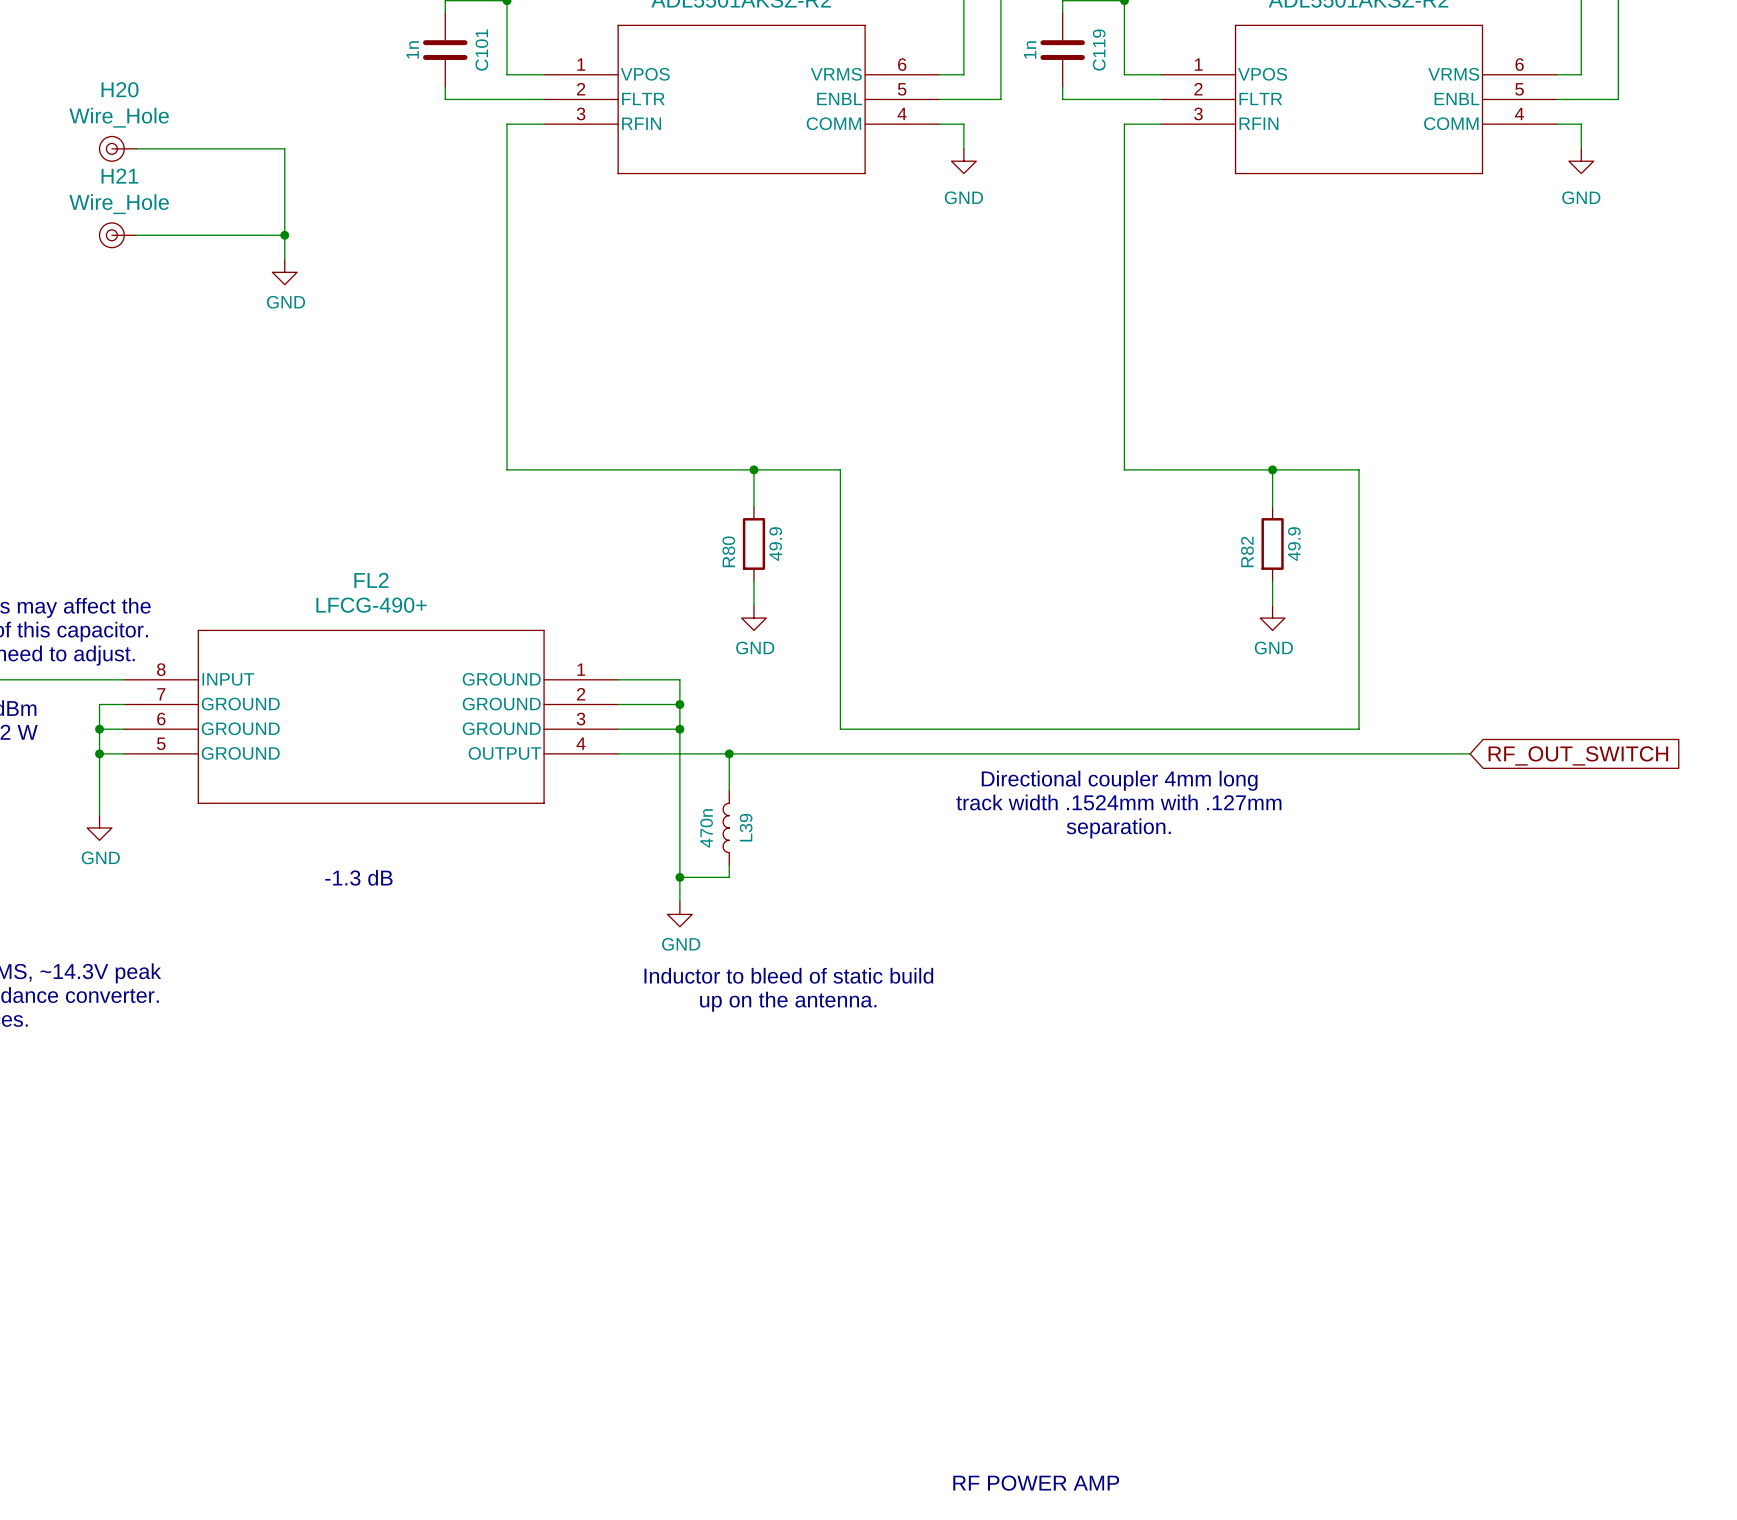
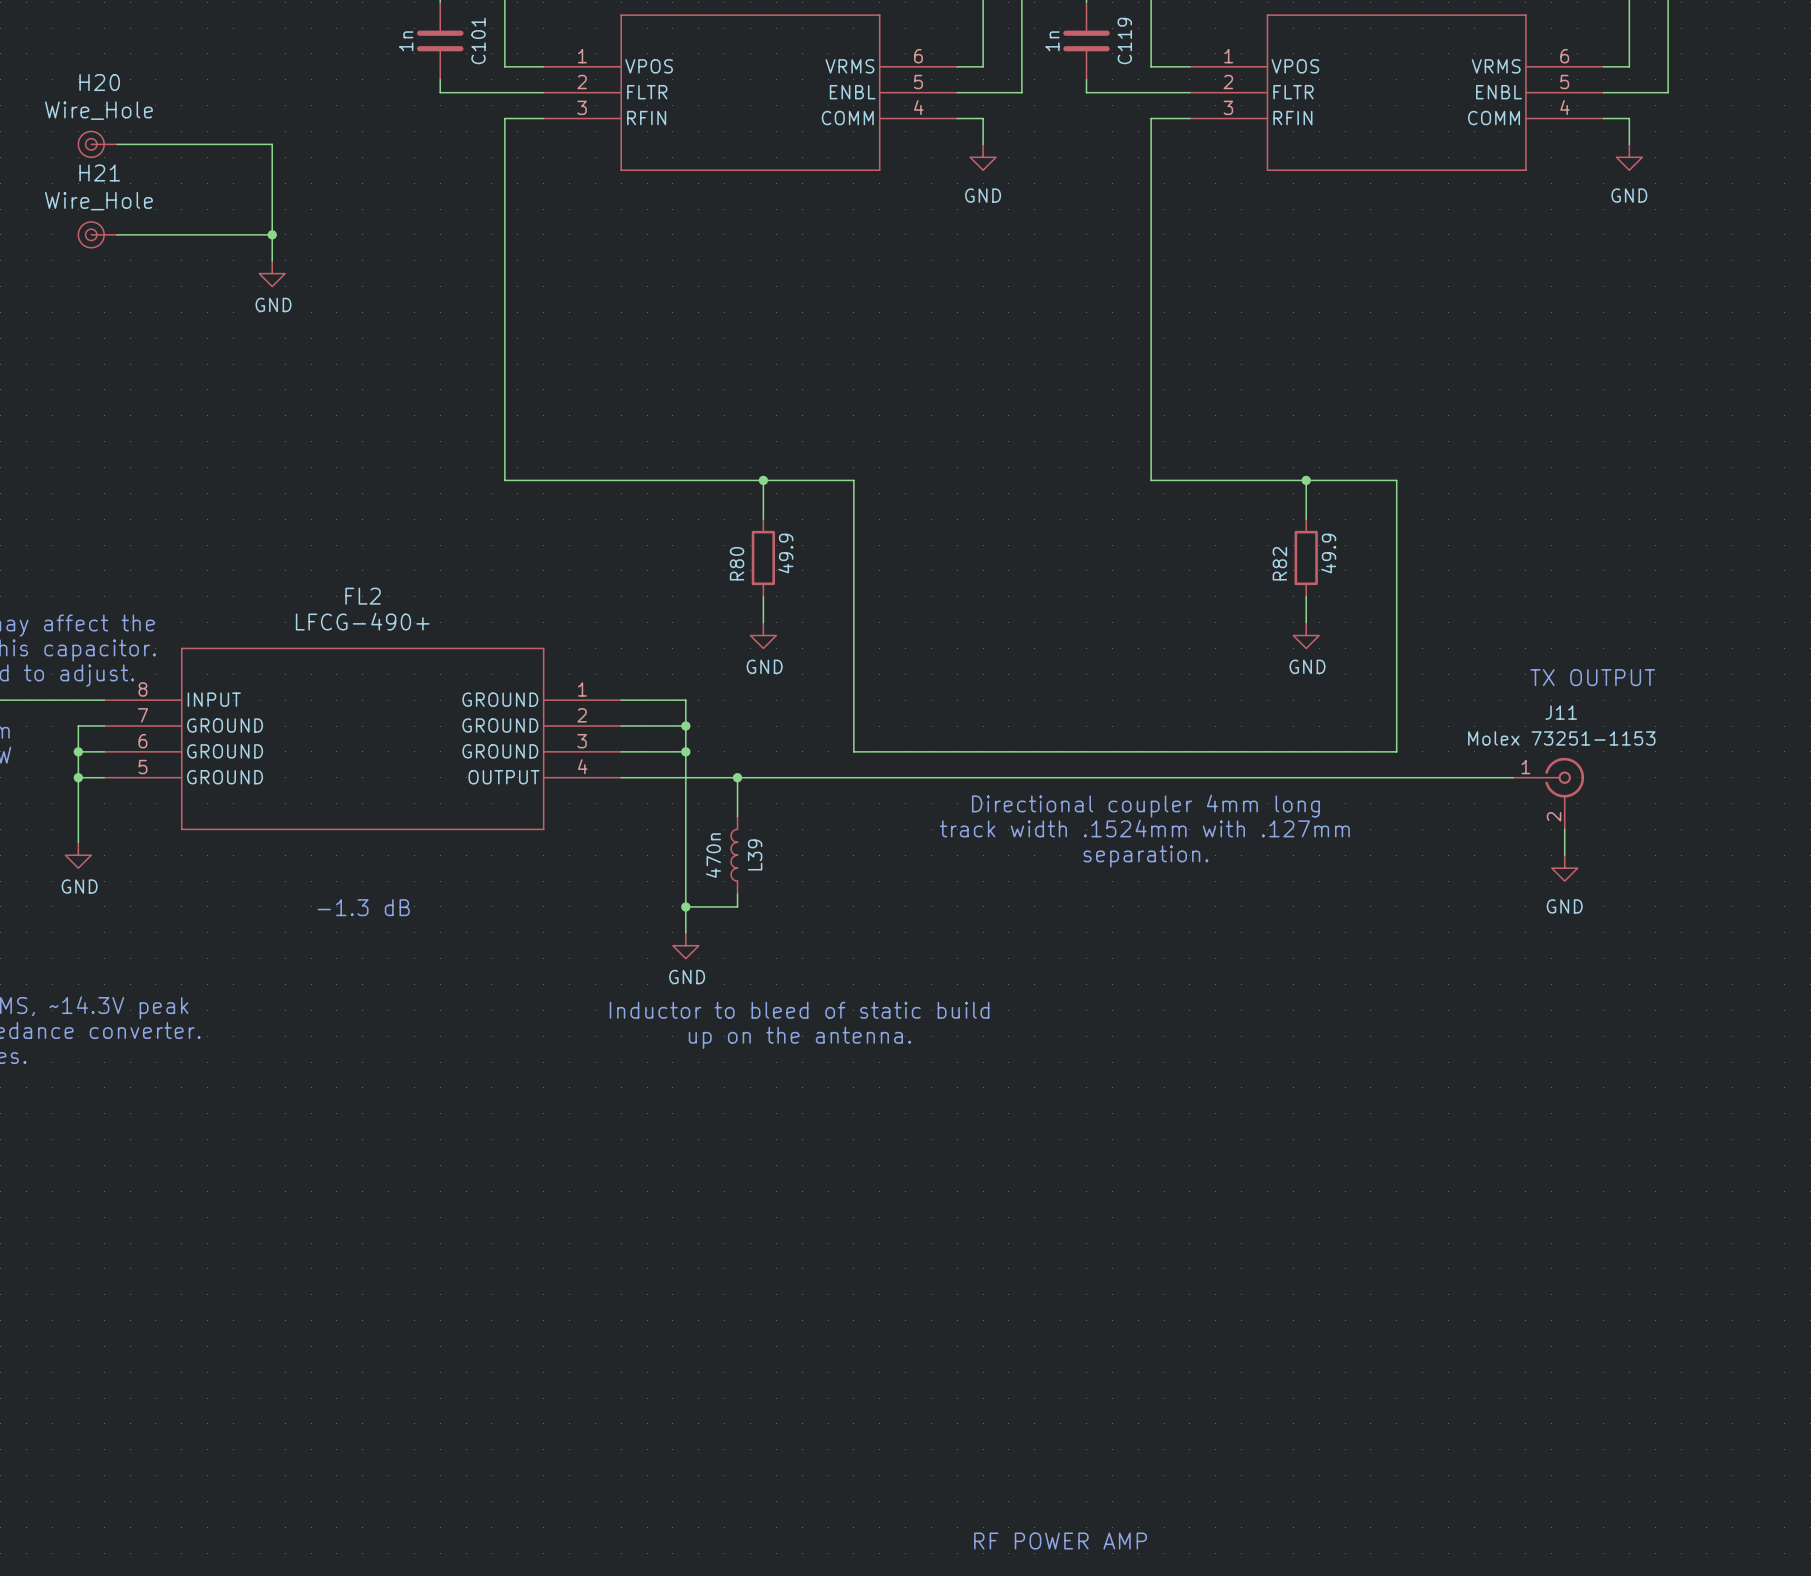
text: none -> TX OUTPUT (1592, 677)
global label: RF_OUT_SWITCH (1578, 755) -> none
J11: none -> Molex 73251-1153 (1548, 793)
wire: none -> (1564, 829) (1564, 855)
power symbol: none -> GND (1564, 868)

